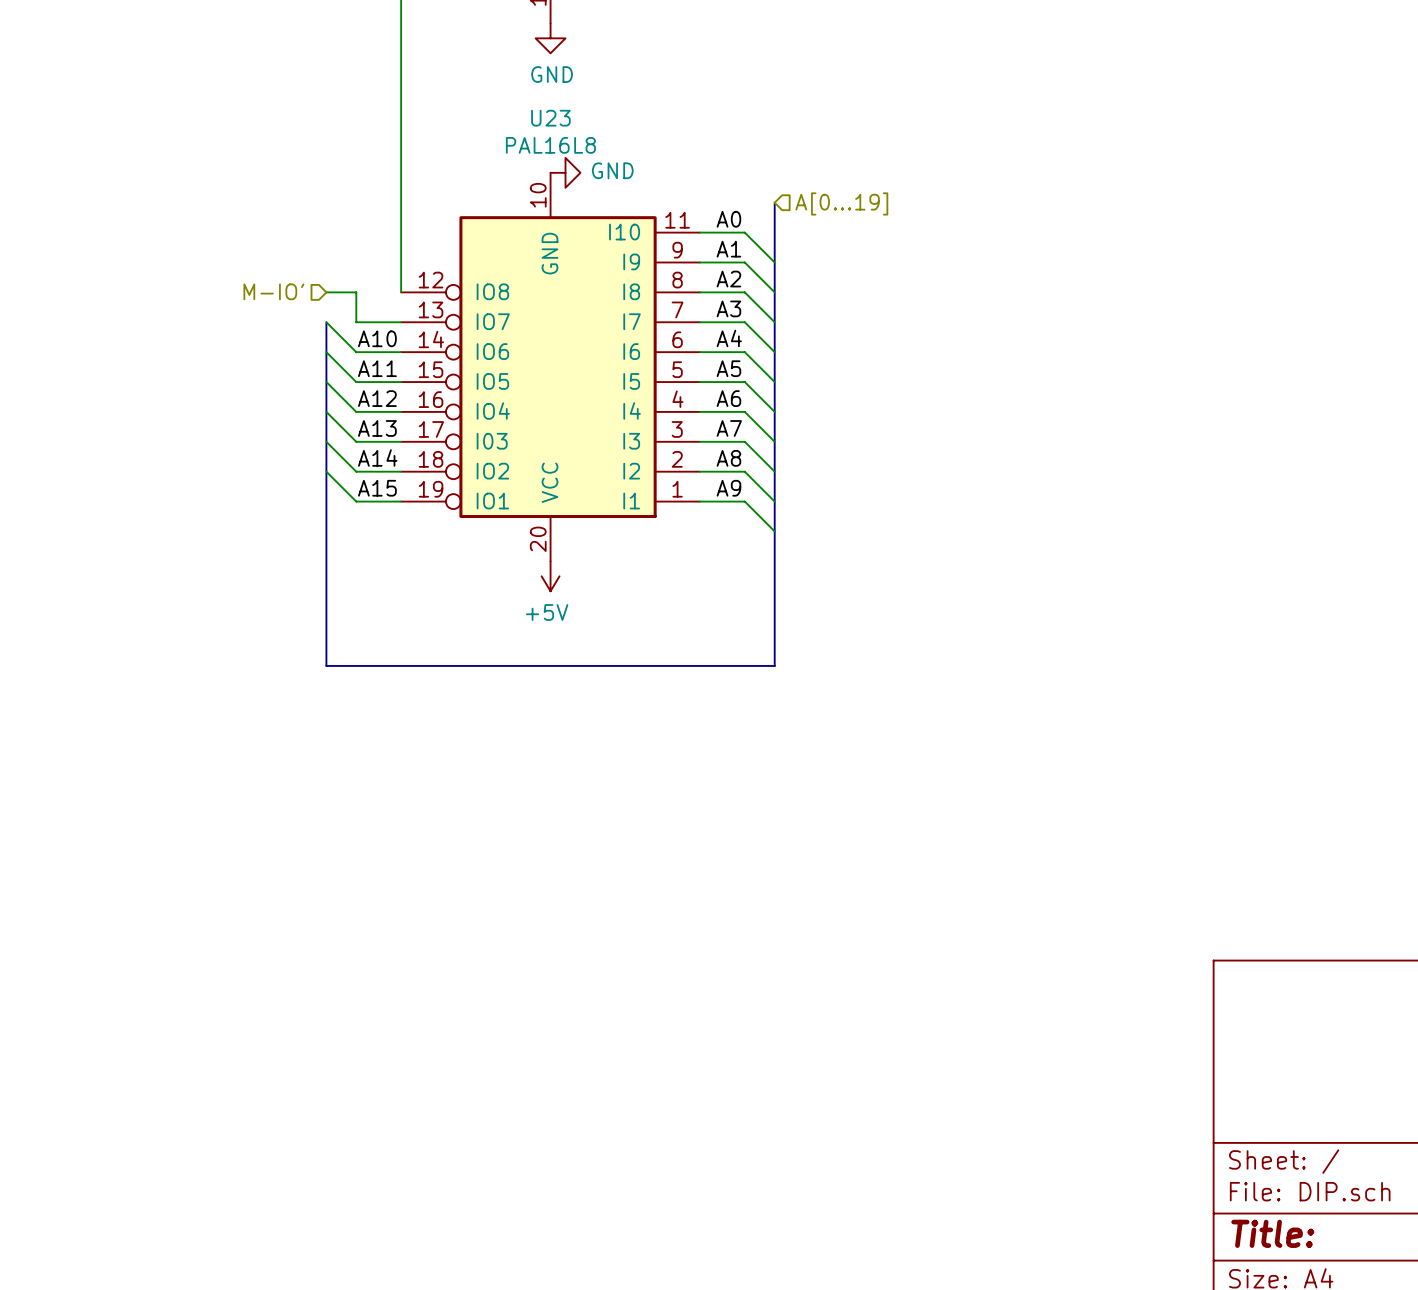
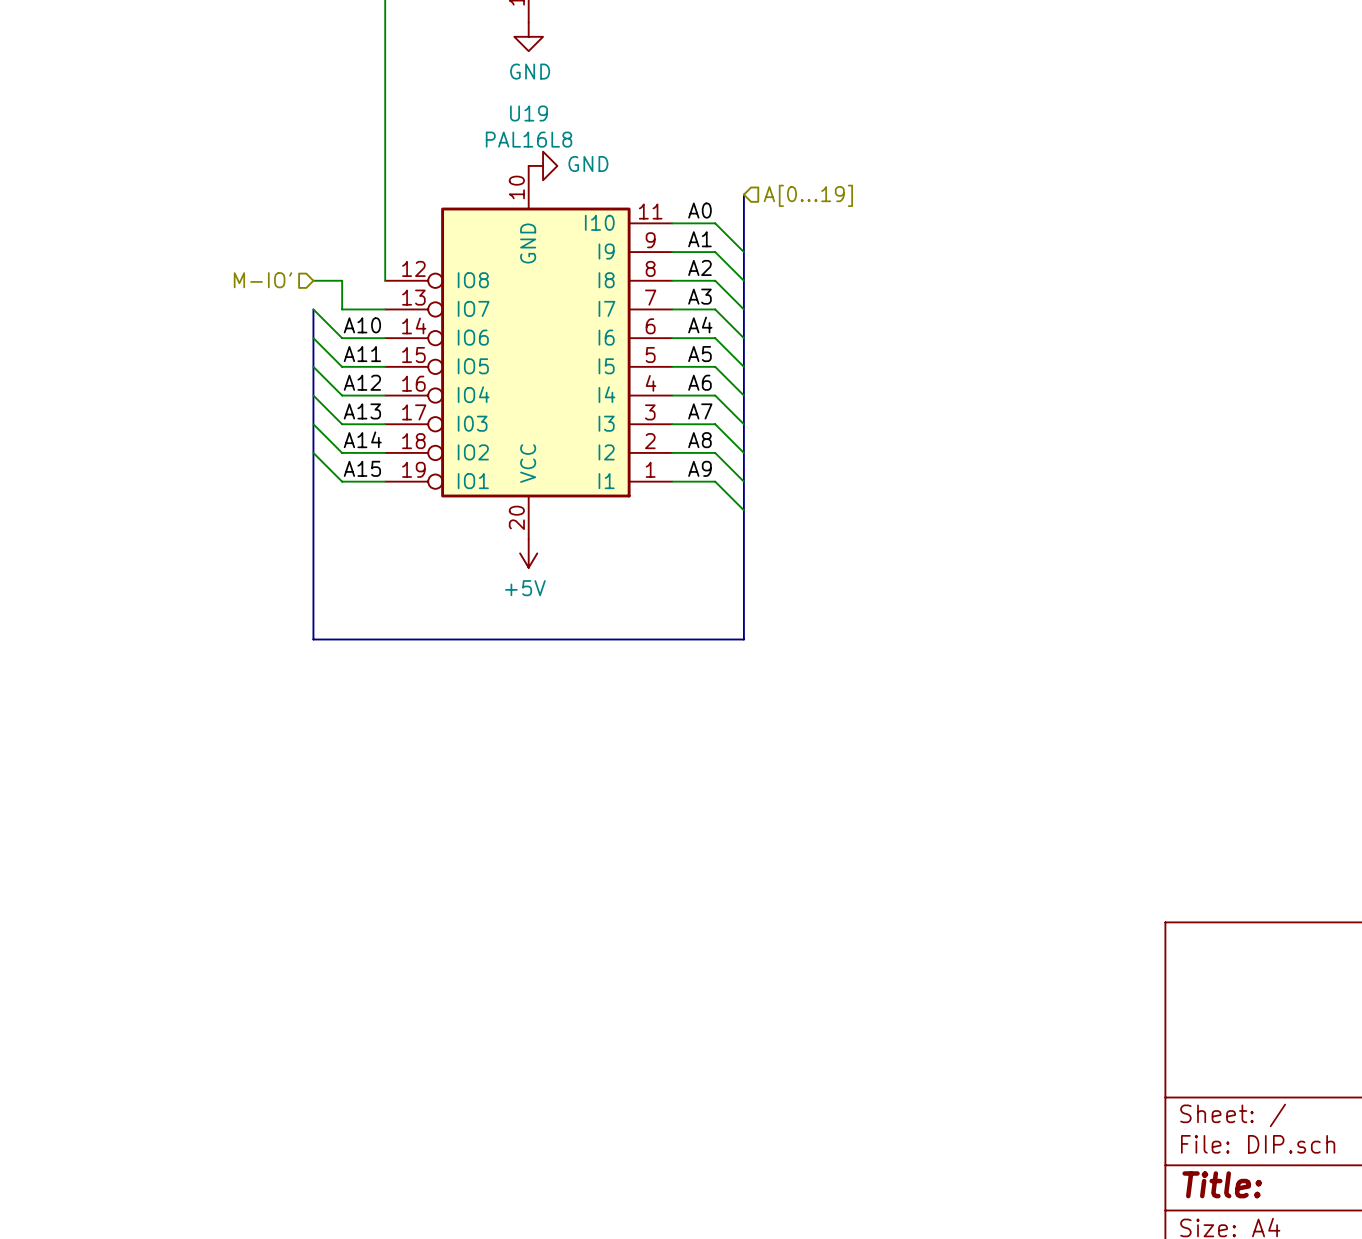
U23 name: U23 (550, 118) -> U19 (529, 113)

